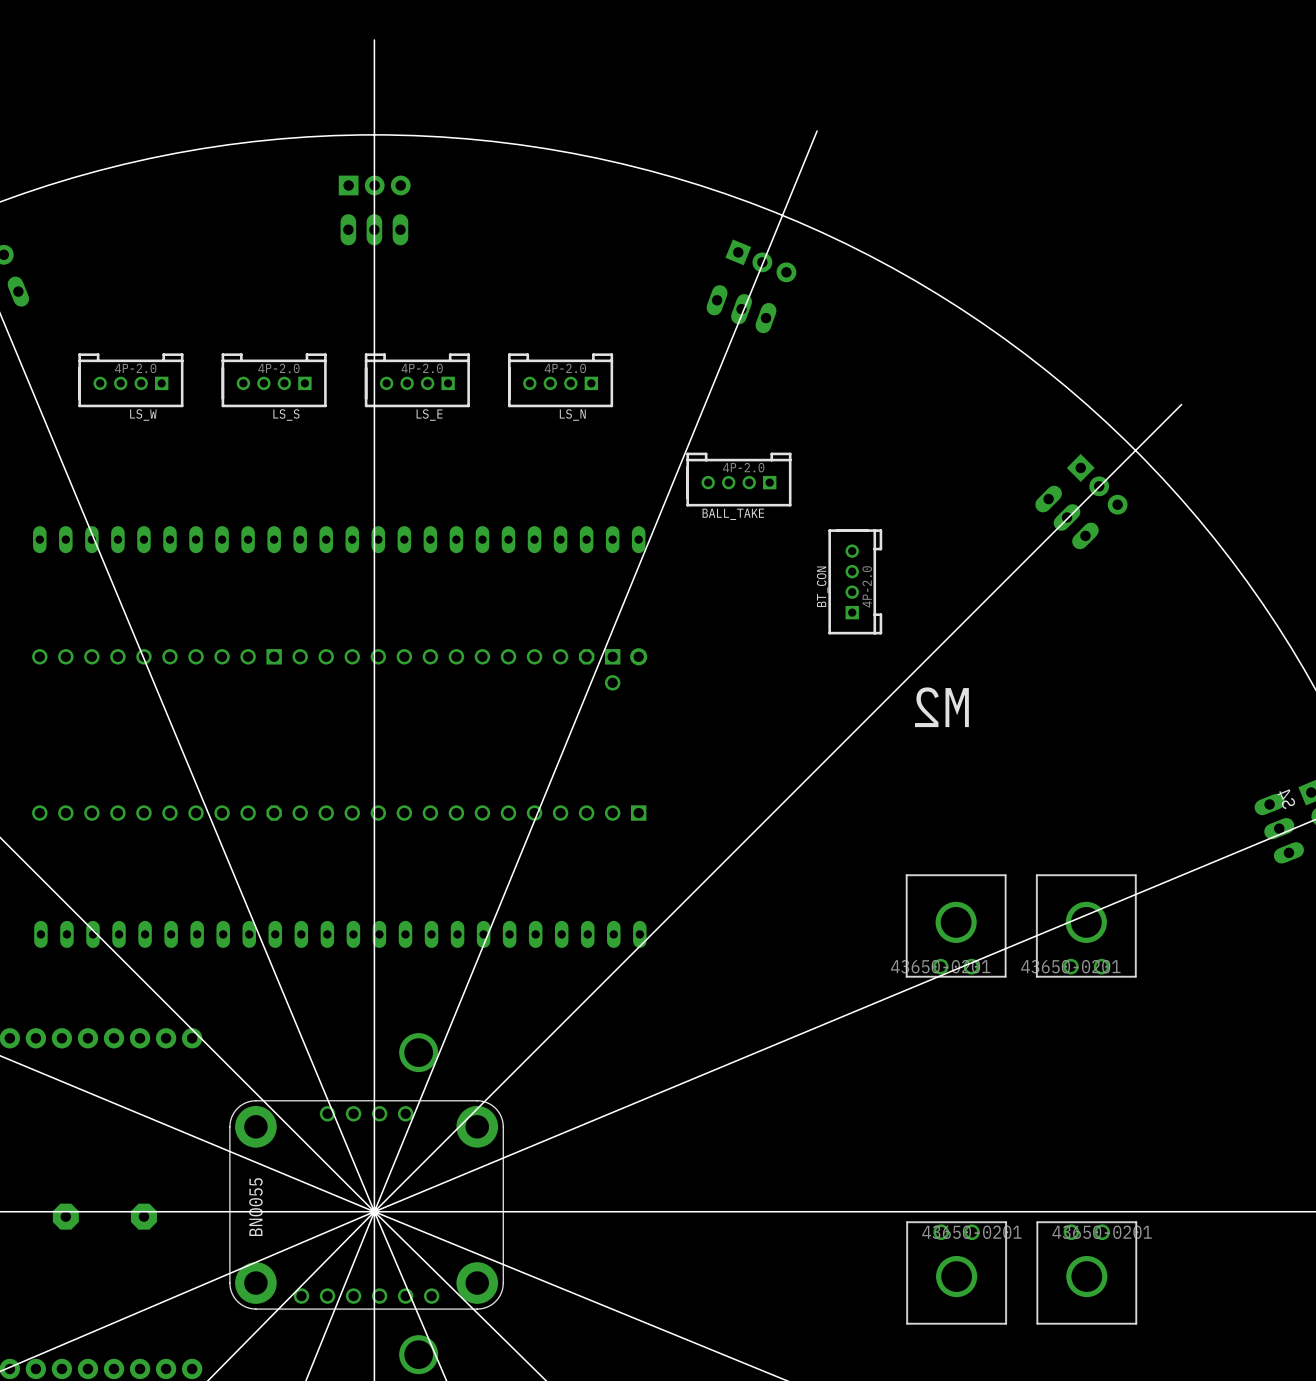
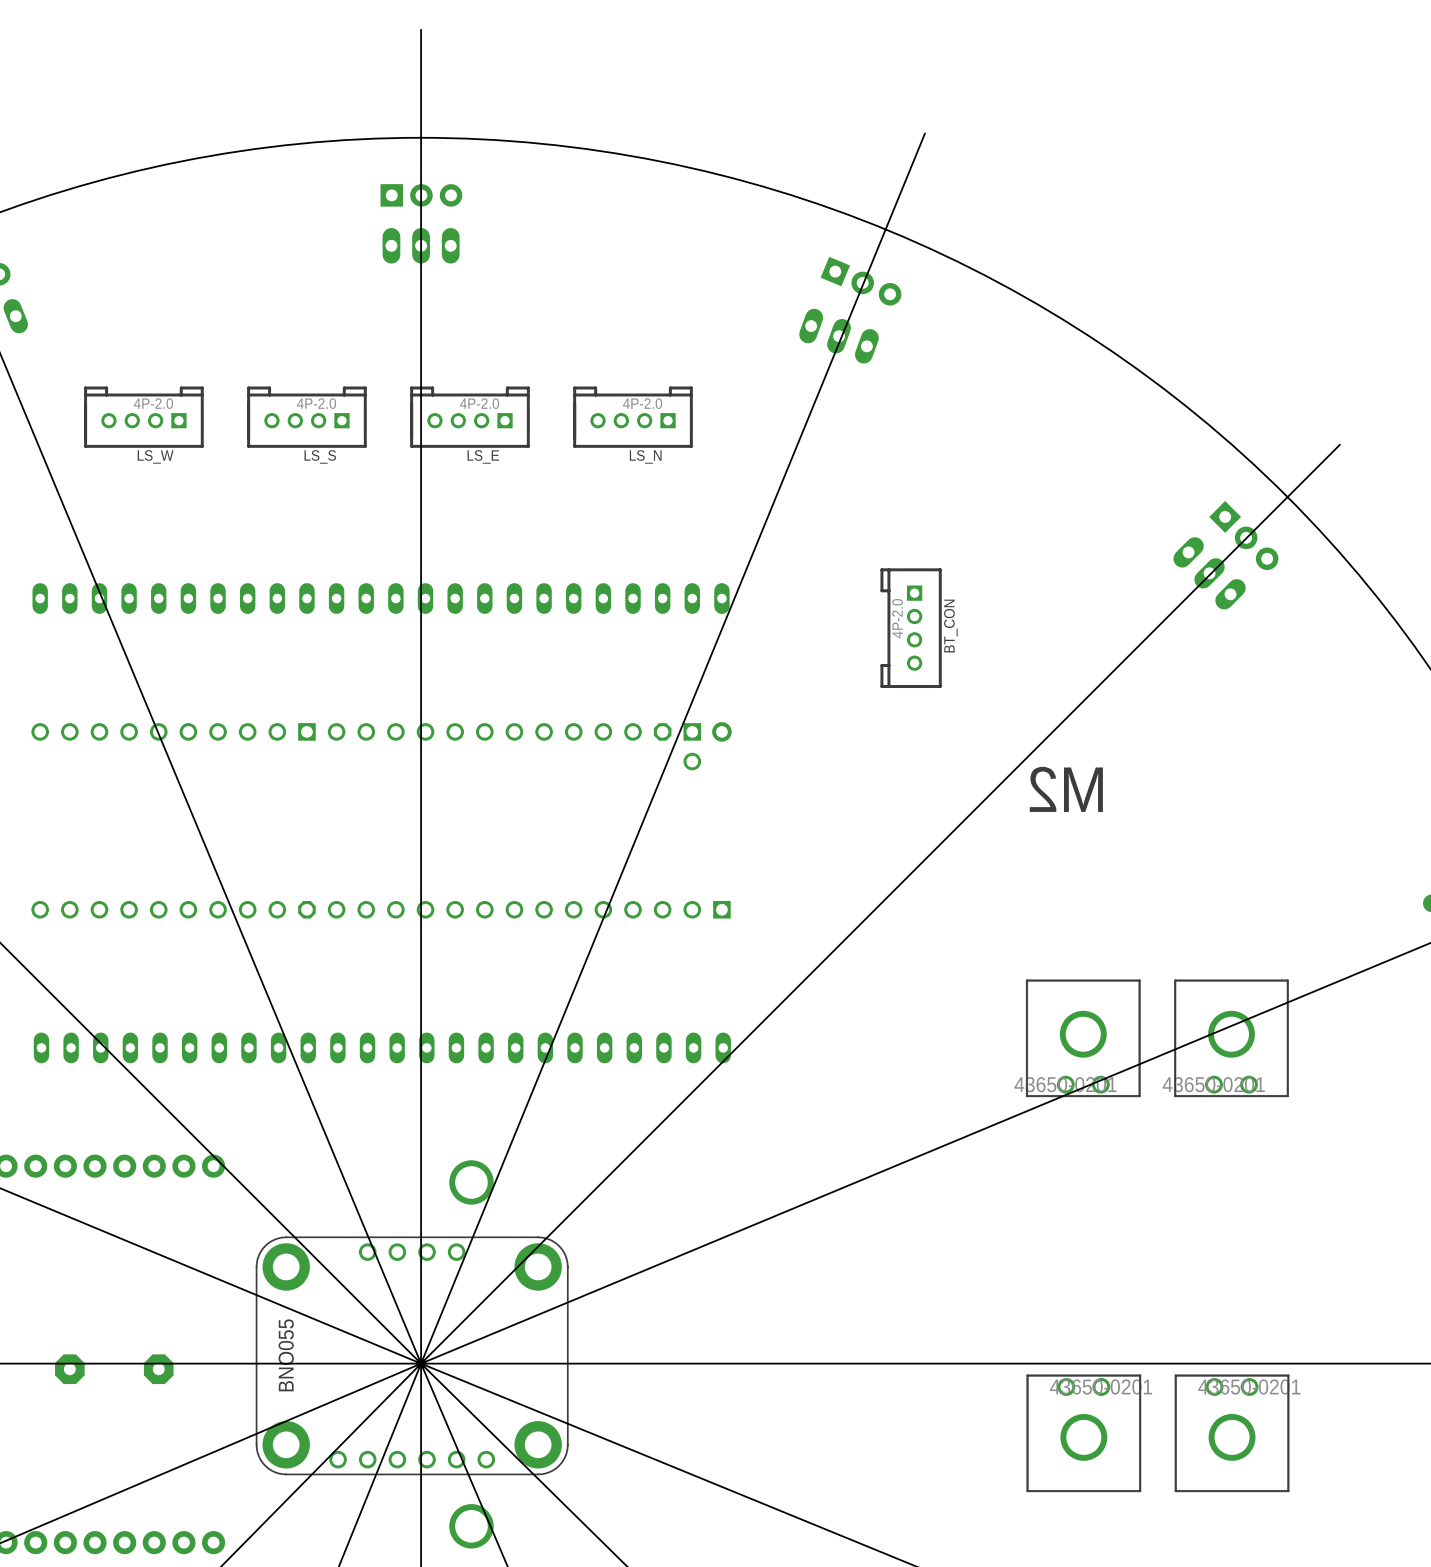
BALL_TAKE: 4P-2.0 (738, 479) -> none
BT_CON rotation: 0° (855, 581) -> 180° (911, 628)

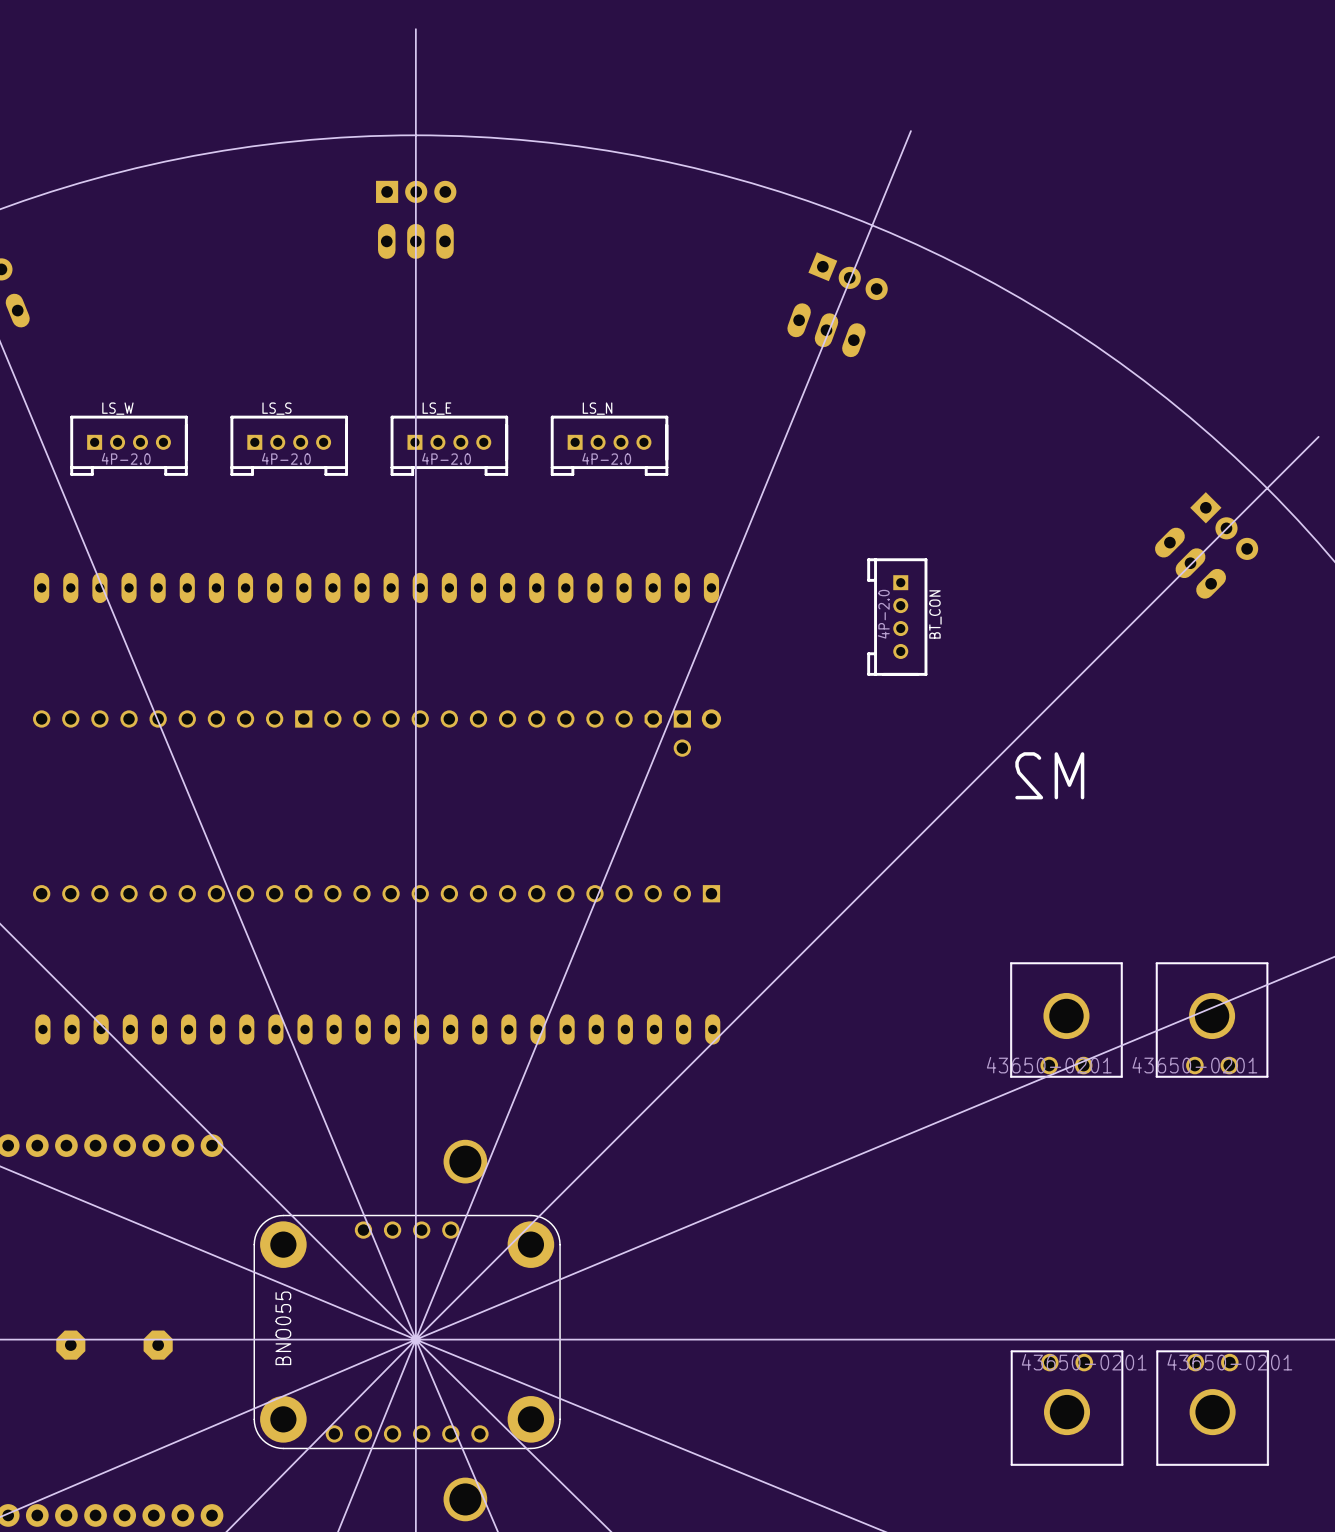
LS_W rotation: 0° (143, 417) -> 180° (129, 445)
LS_S rotation: 0° (306, 417) -> 180° (289, 445)
LS_E rotation: 0° (469, 417) -> 180° (449, 445)
LS_N rotation: 0° (633, 417) -> 180° (609, 445)

